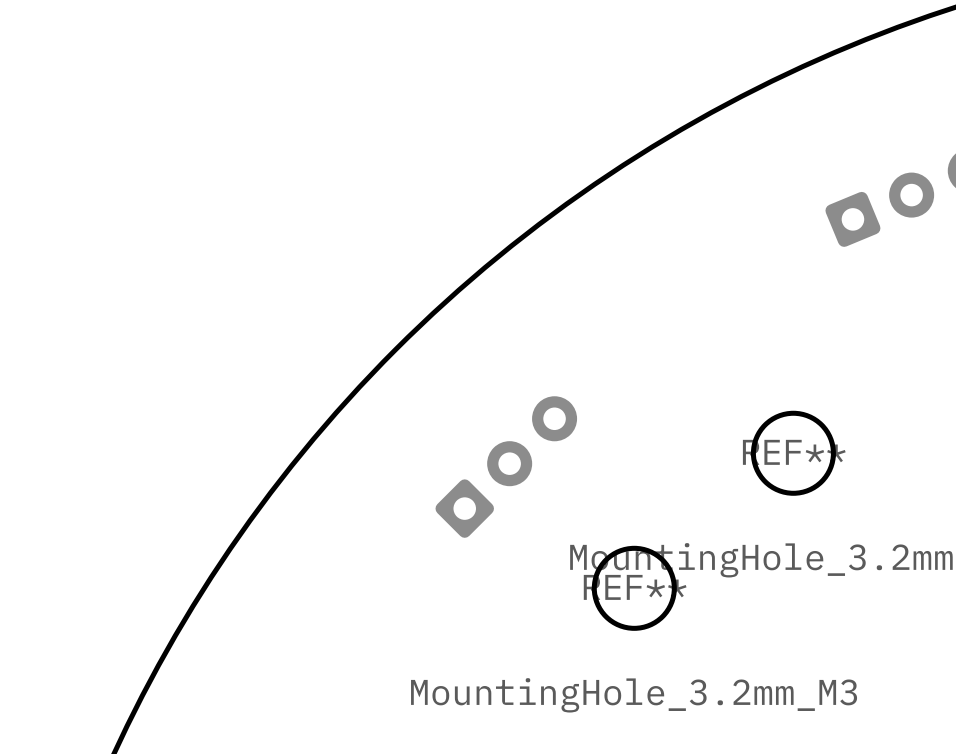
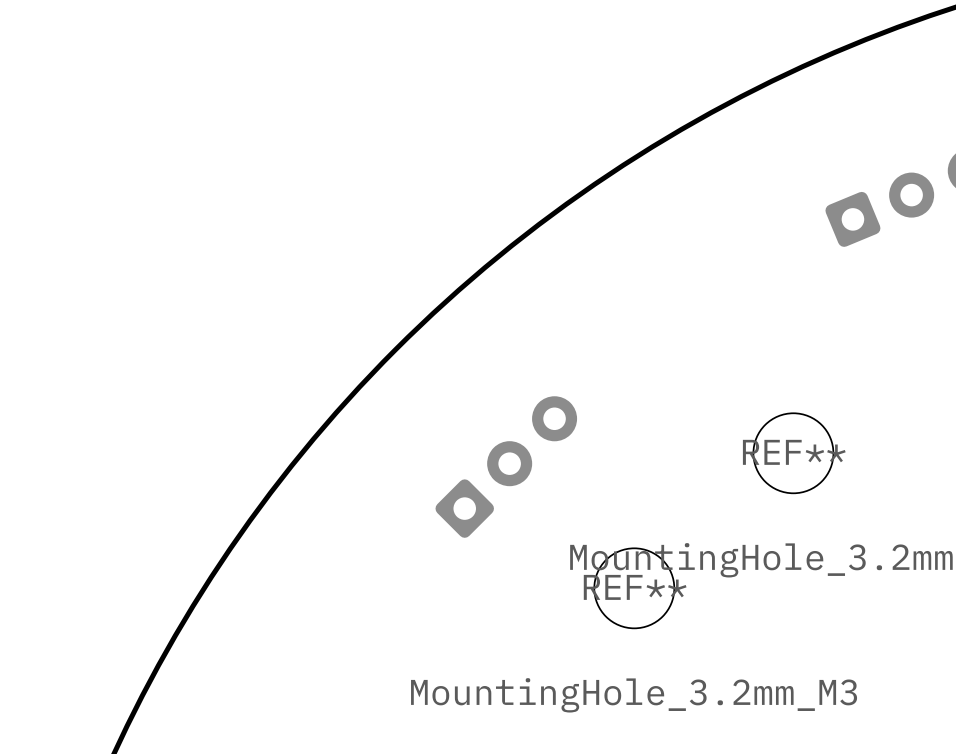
round board edge: [750, 410, 836, 496] -> none
round board edge: [591, 545, 677, 631] -> none

